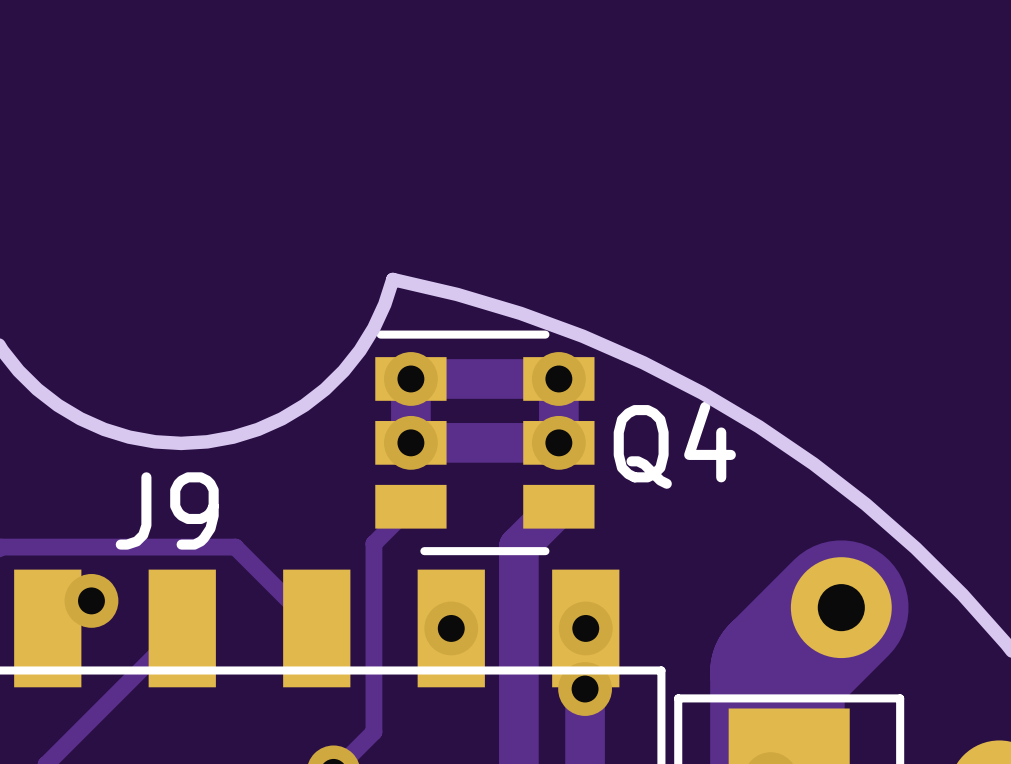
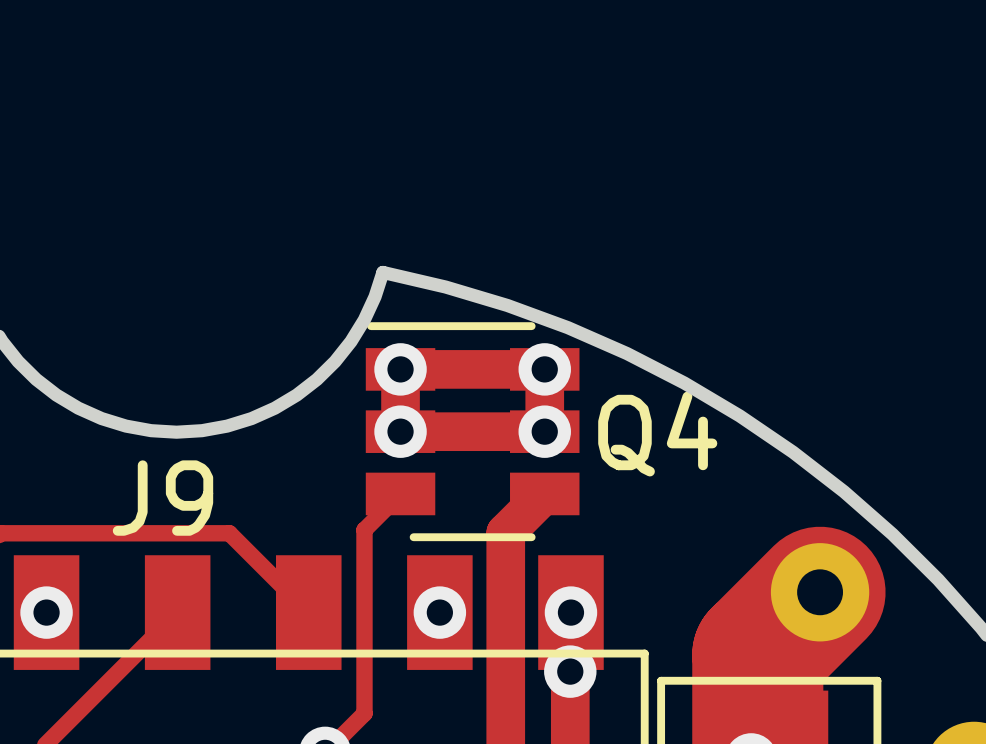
via position: (91, 600) -> (46, 612)

